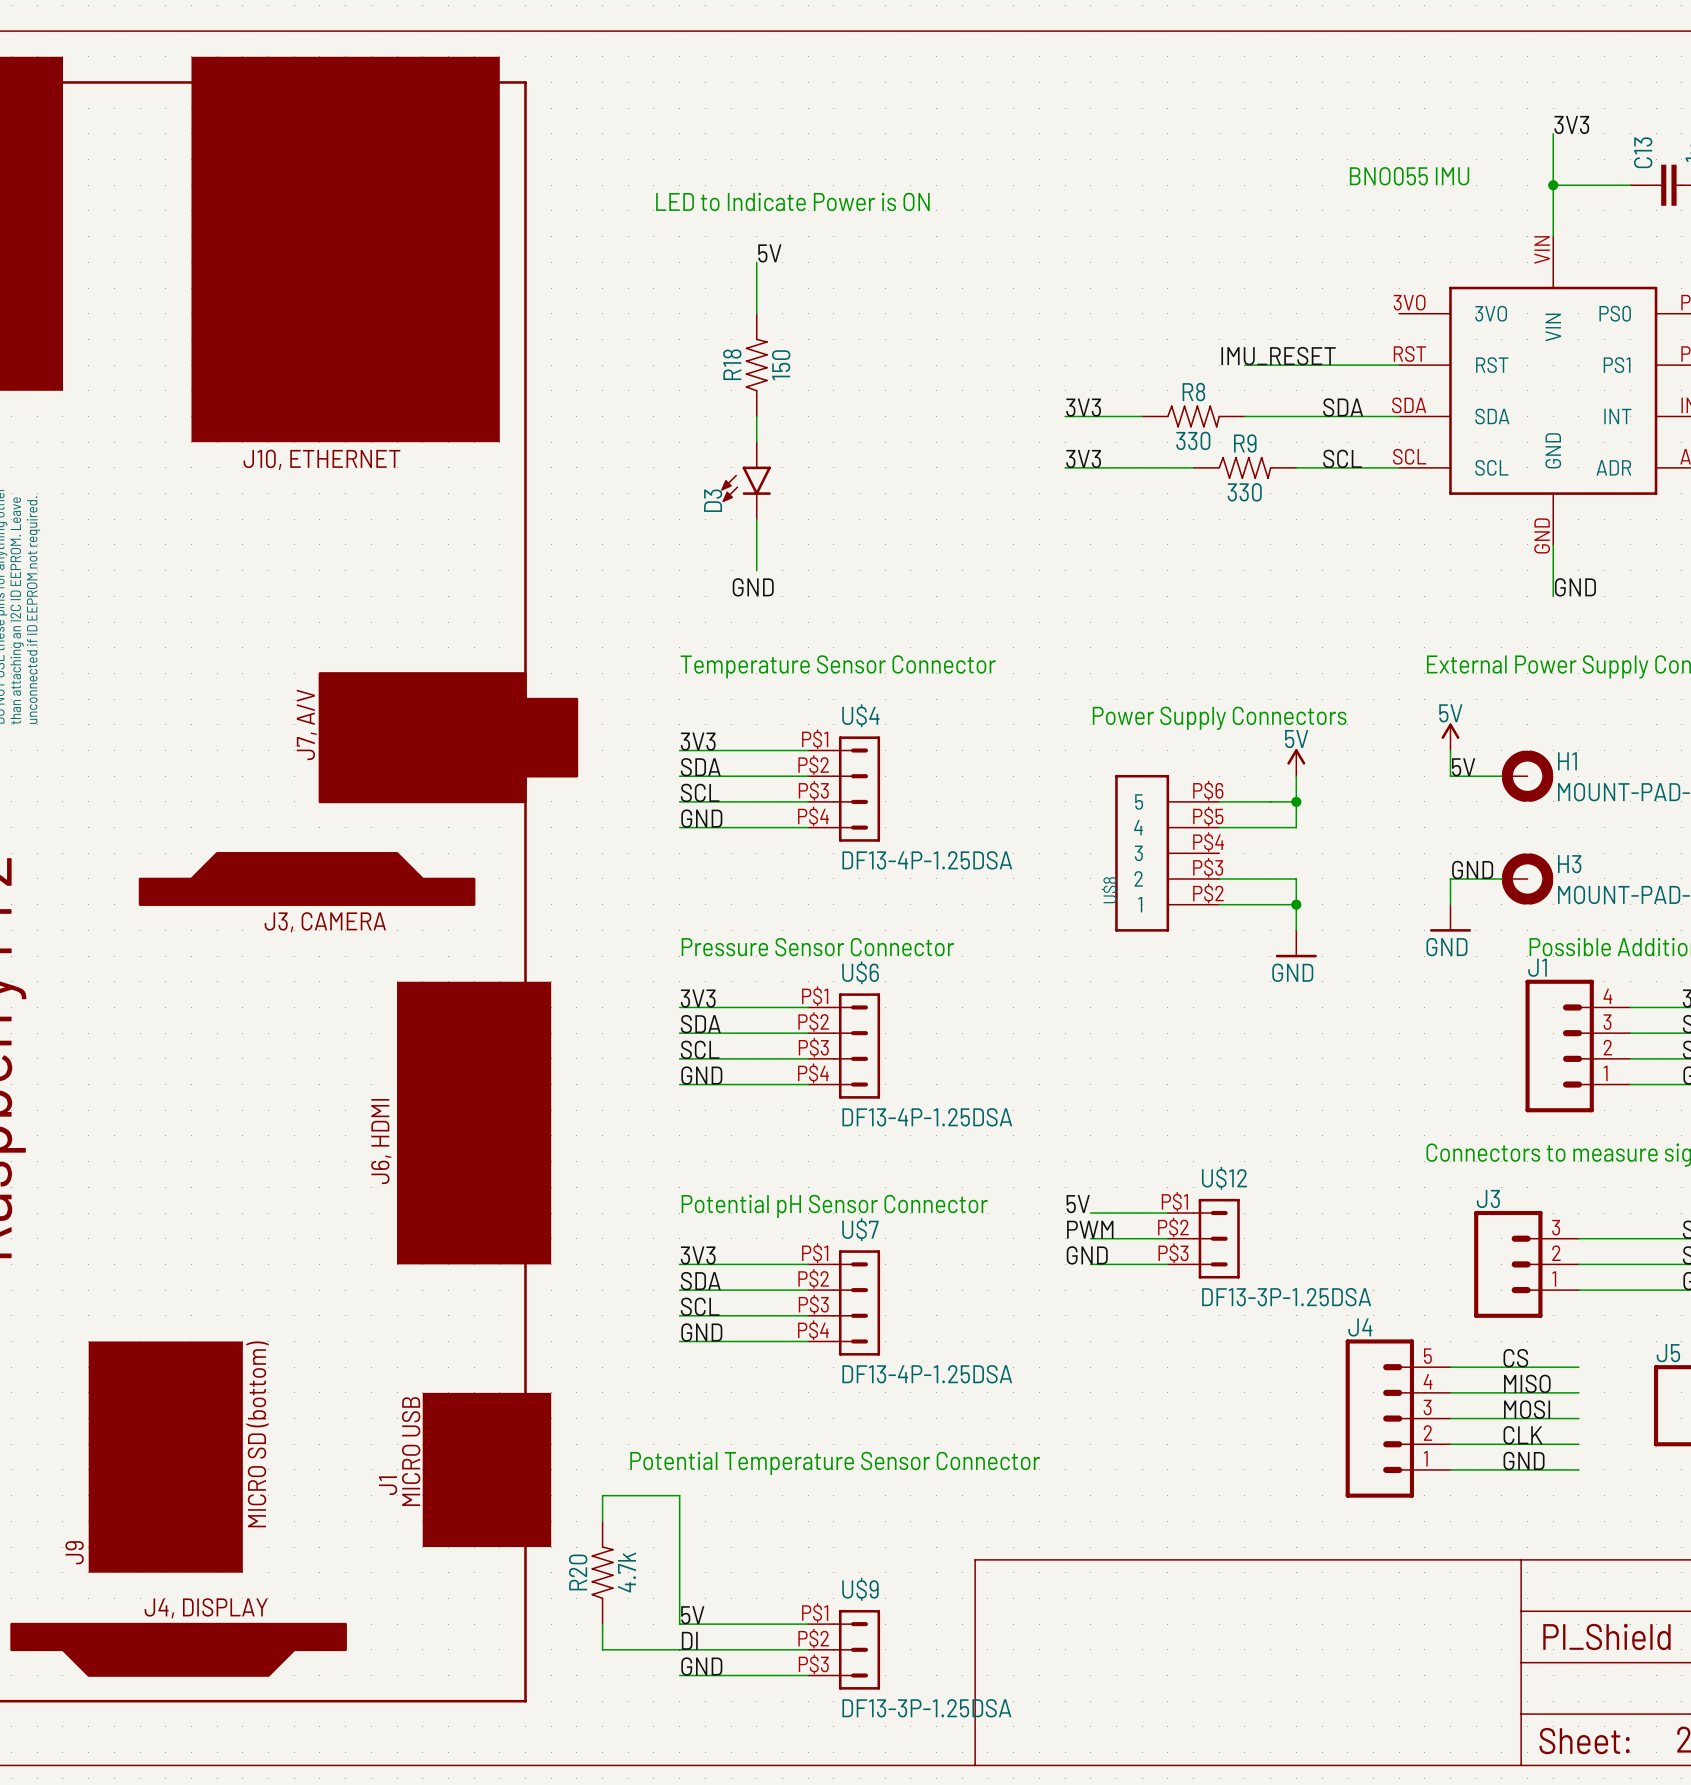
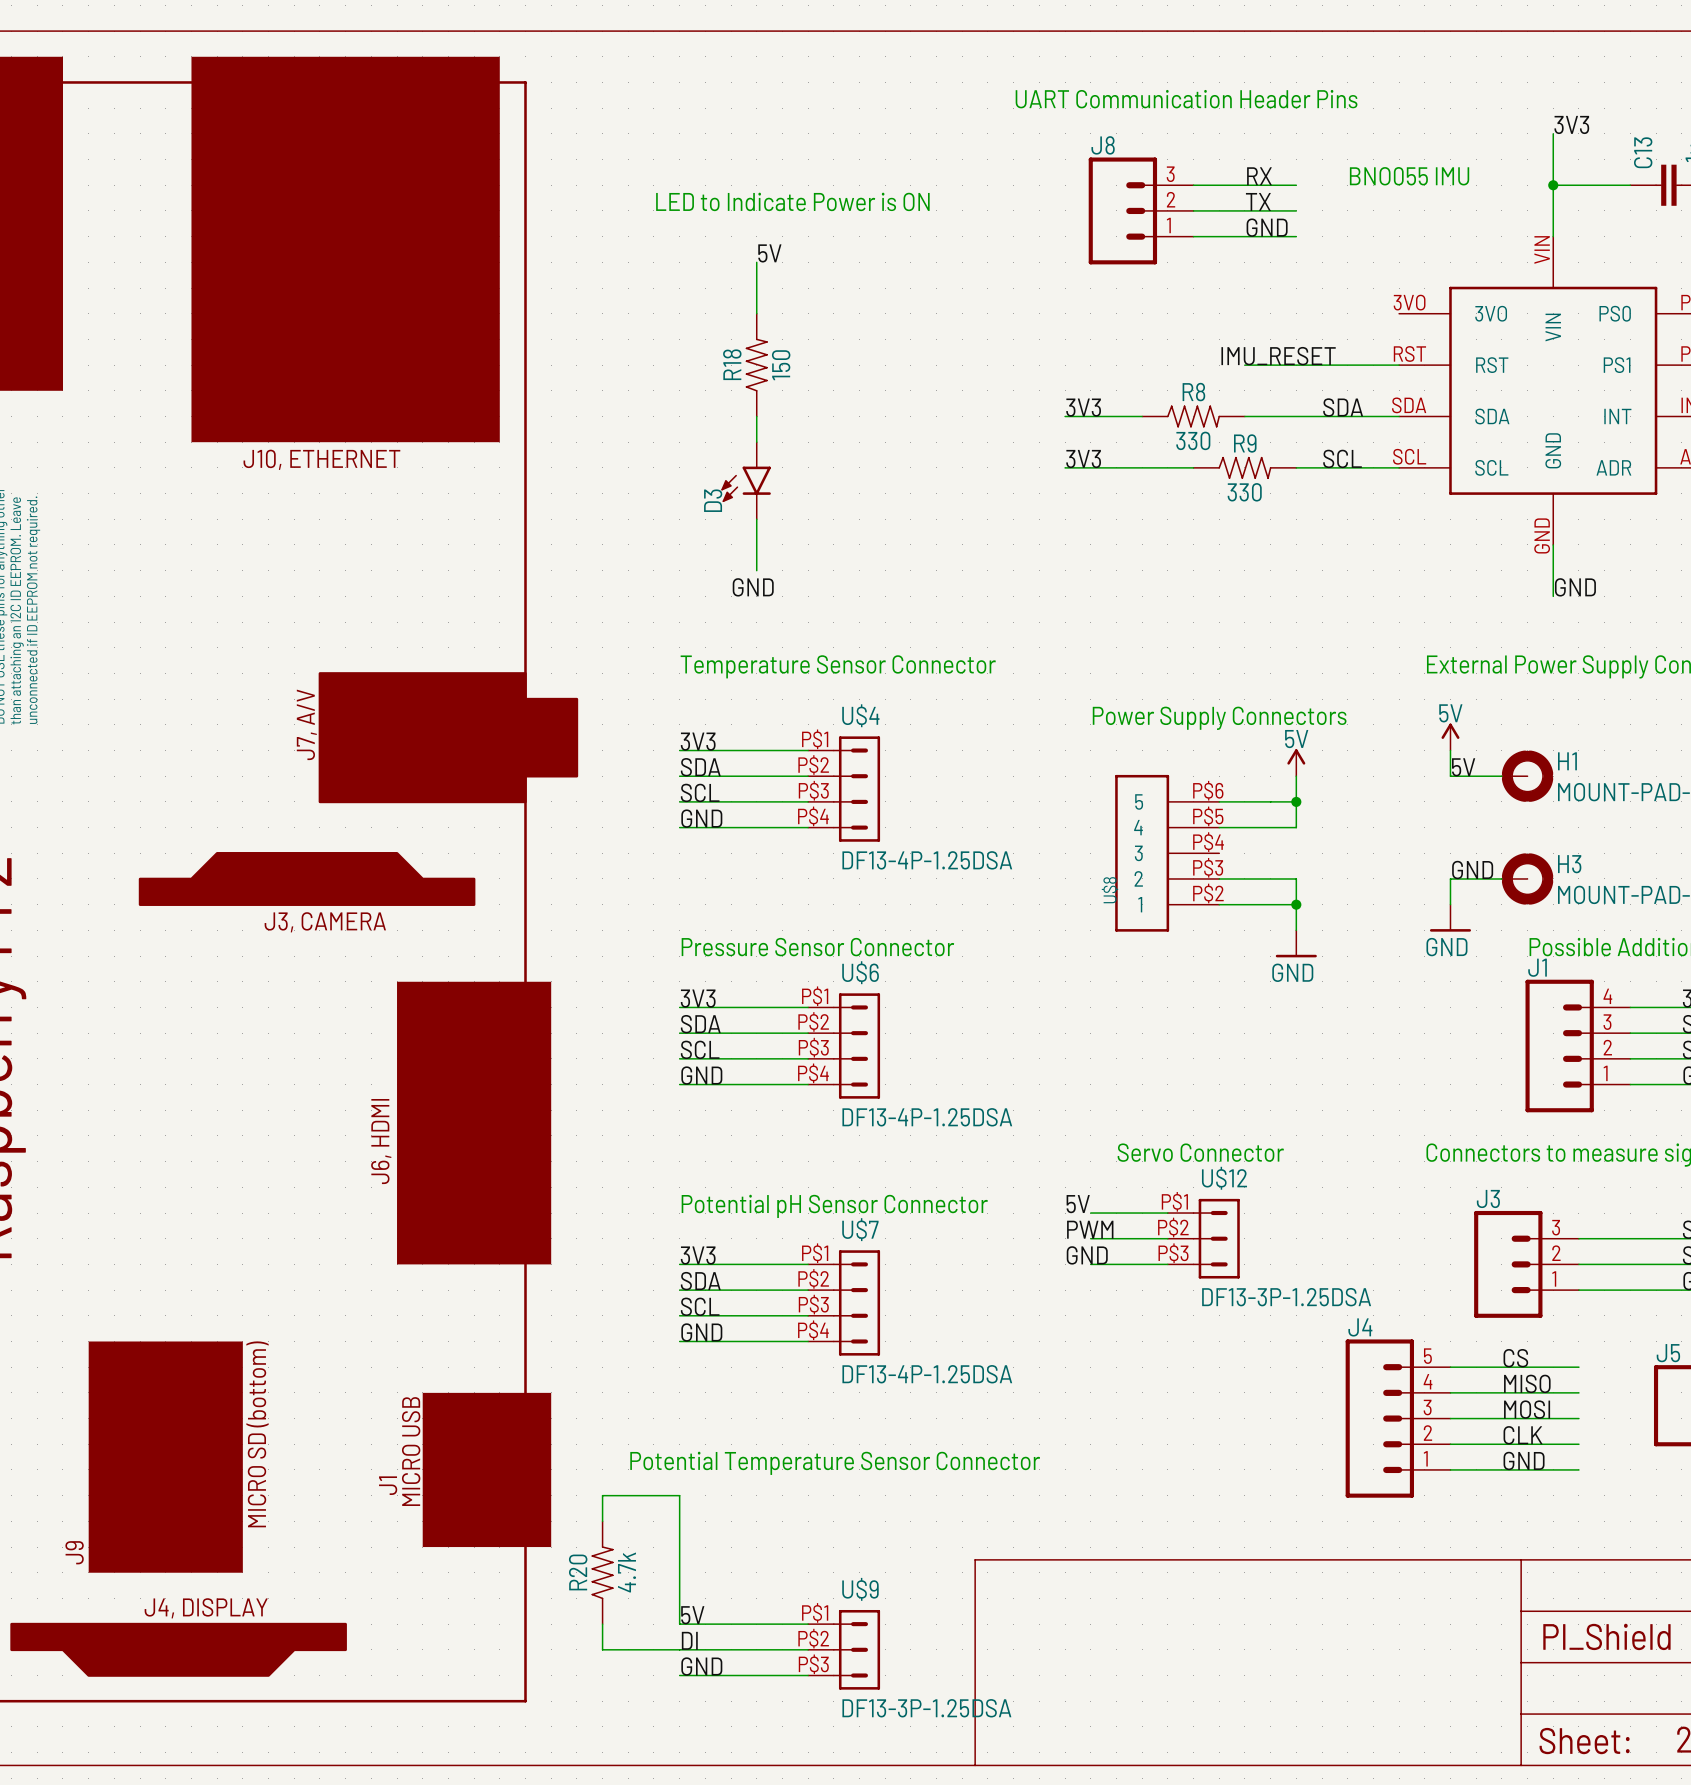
text: none -> UART Communication Header Pins (1186, 99)
label: none -> RX (1259, 176)
wire: none -> (1193, 185) (1296, 185)
label: none -> TX (1258, 201)
J8: none -> (1141, 210)
wire: none -> (1193, 210) (1296, 210)
label: none -> GND (1267, 227)
wire: none -> (1193, 236) (1296, 236)
text: none -> Servo Connector (1200, 1152)

